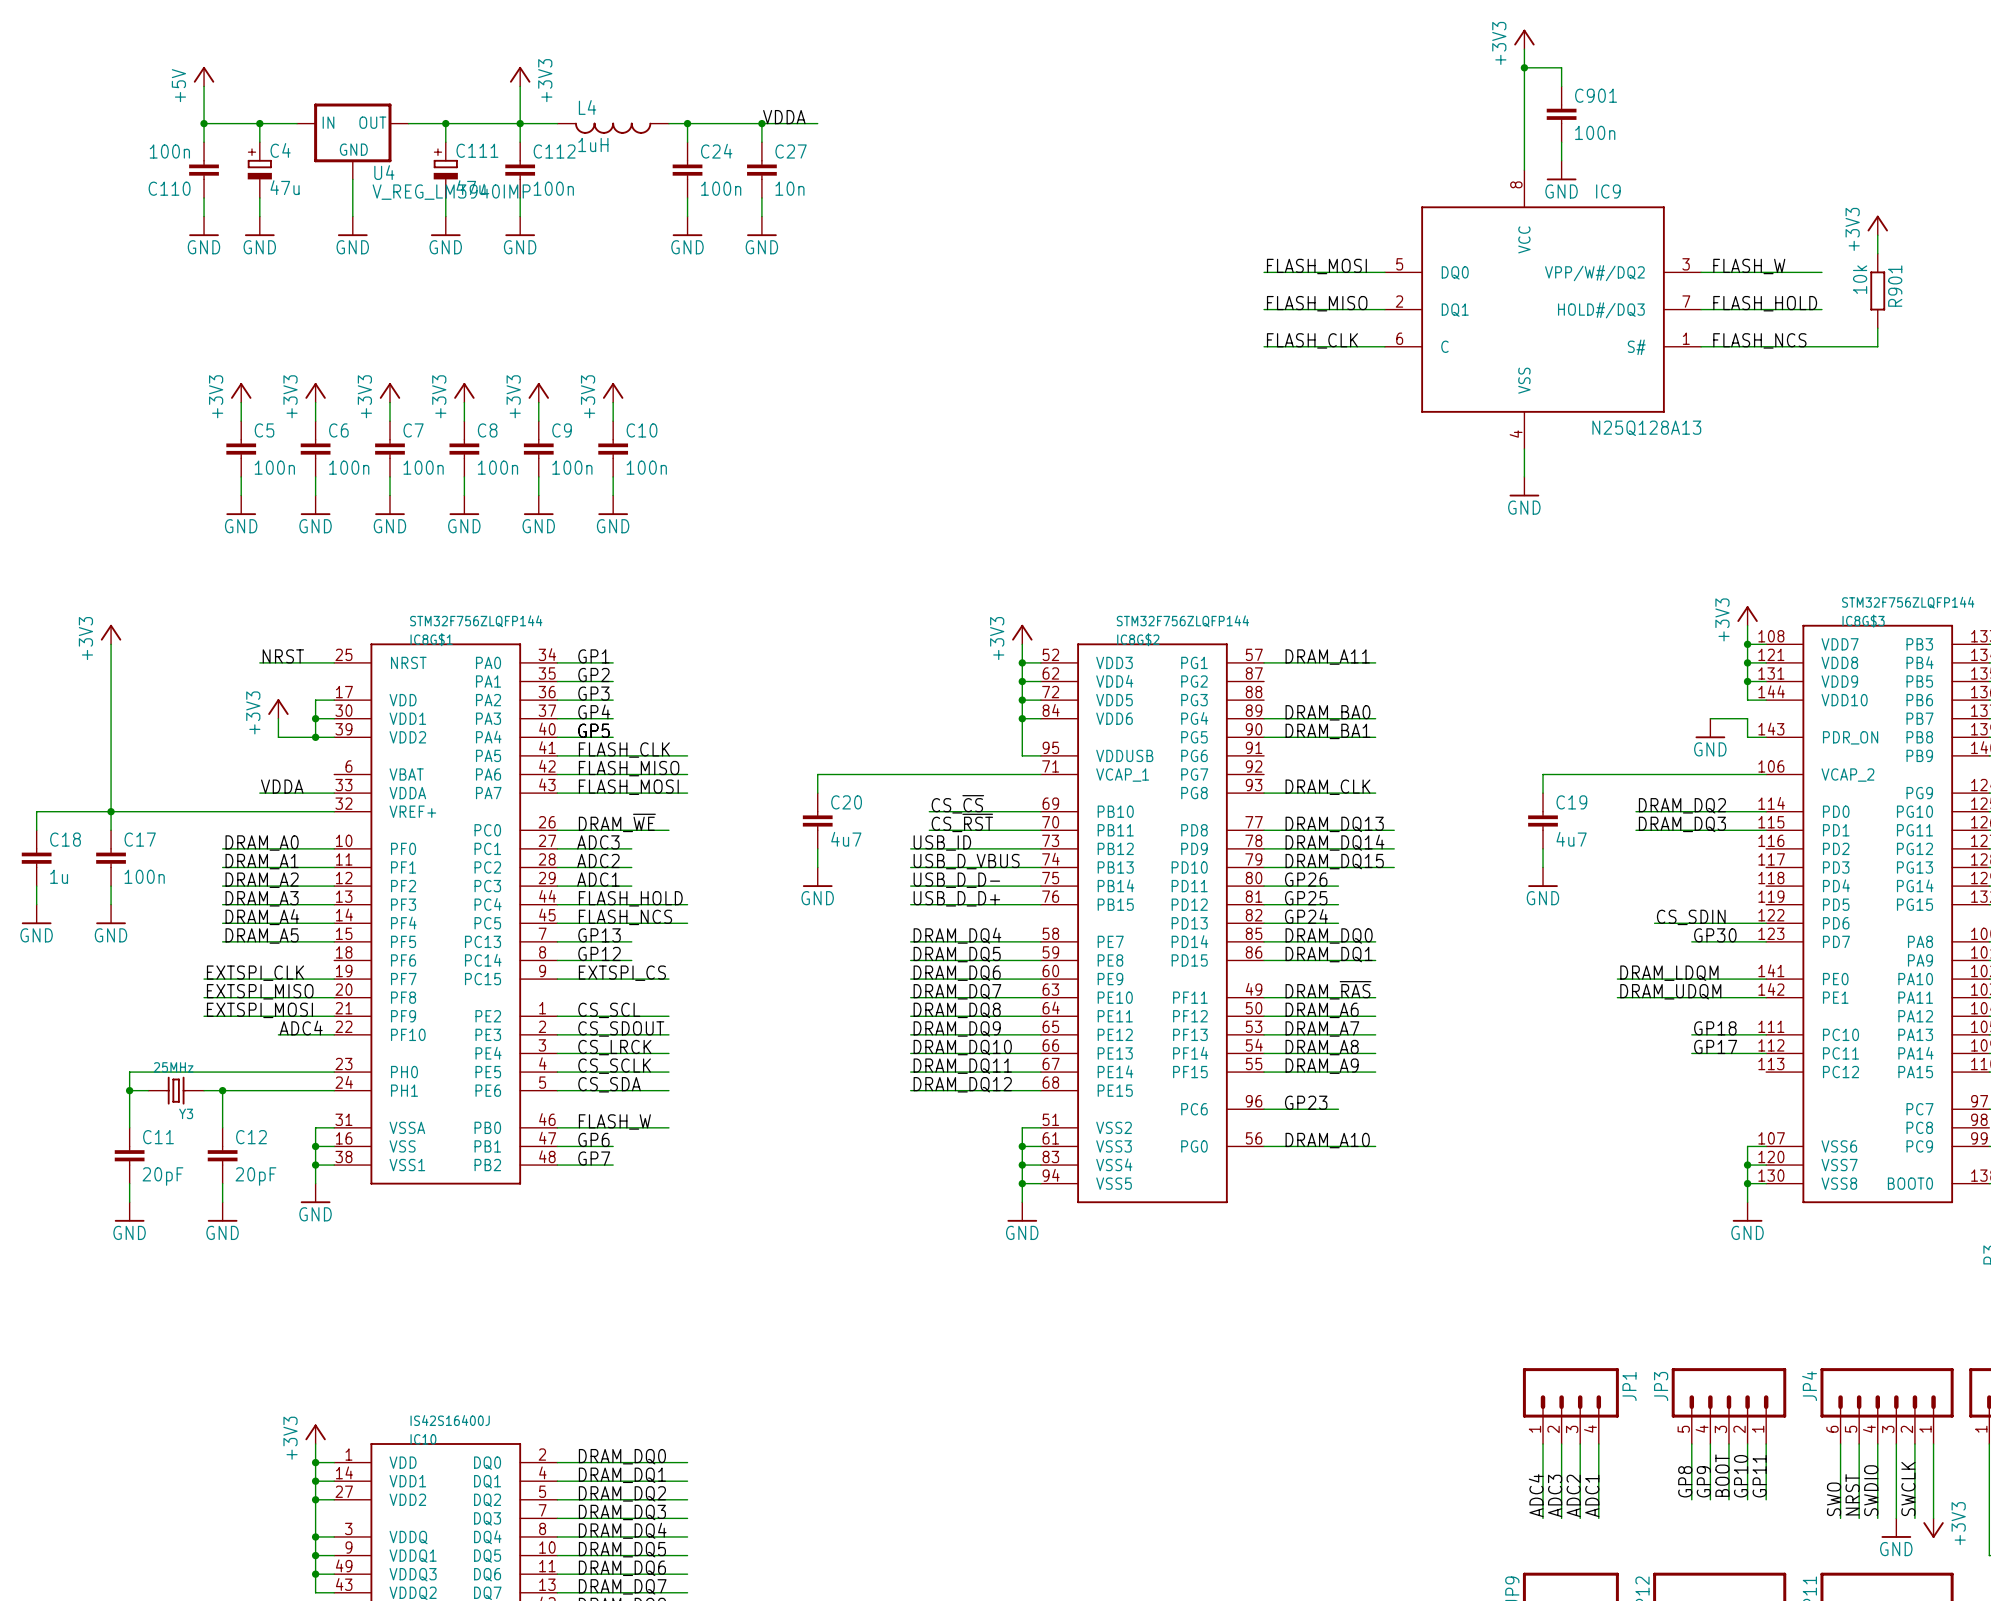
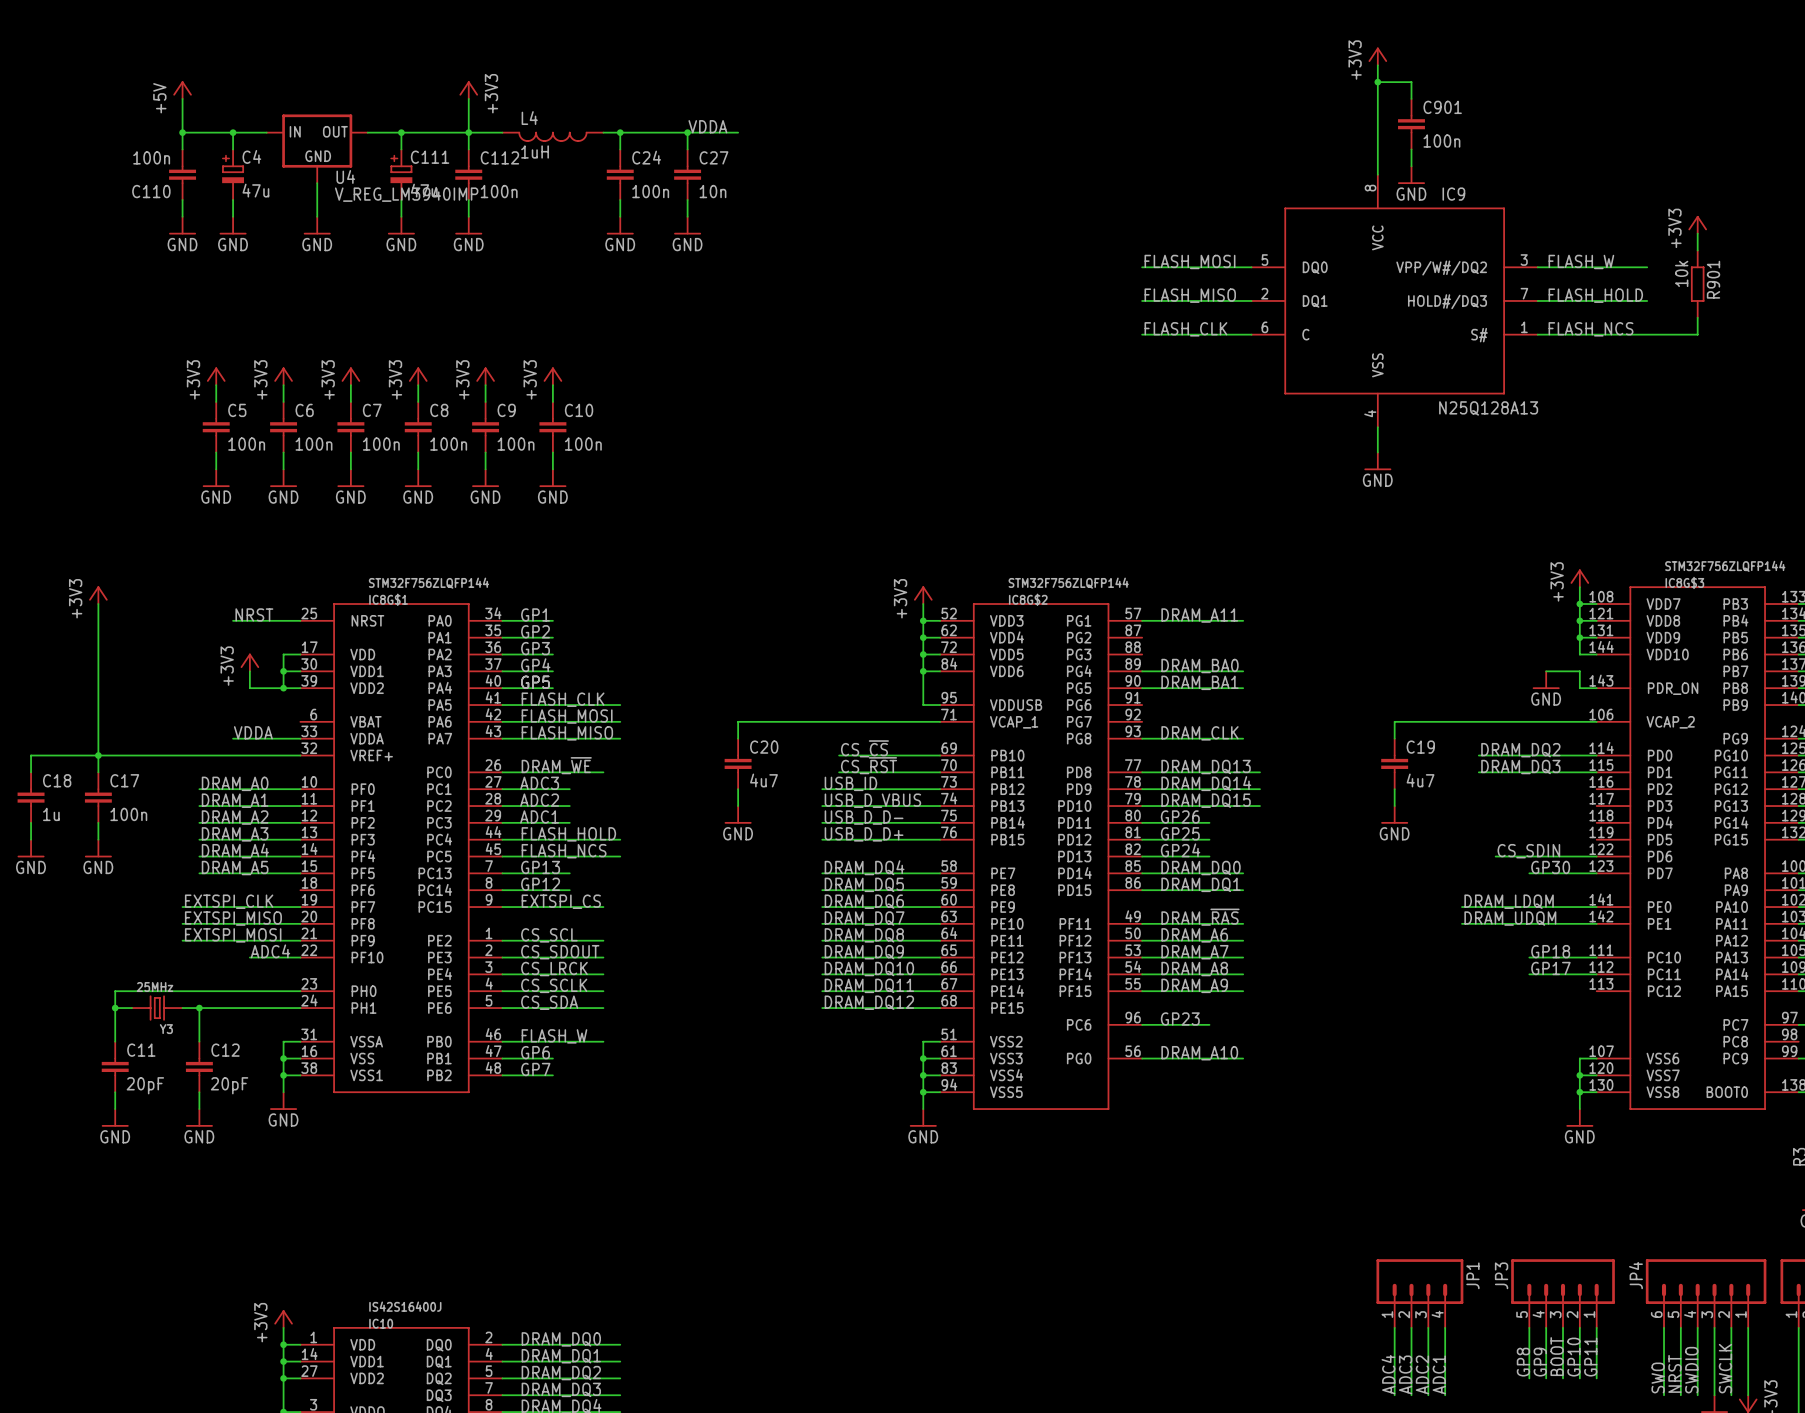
label: FLASH_MISO (629, 768) -> FLASH_MOSI (567, 716)
label: FLASH_MOSI (628, 787) -> FLASH_MISO (567, 733)

